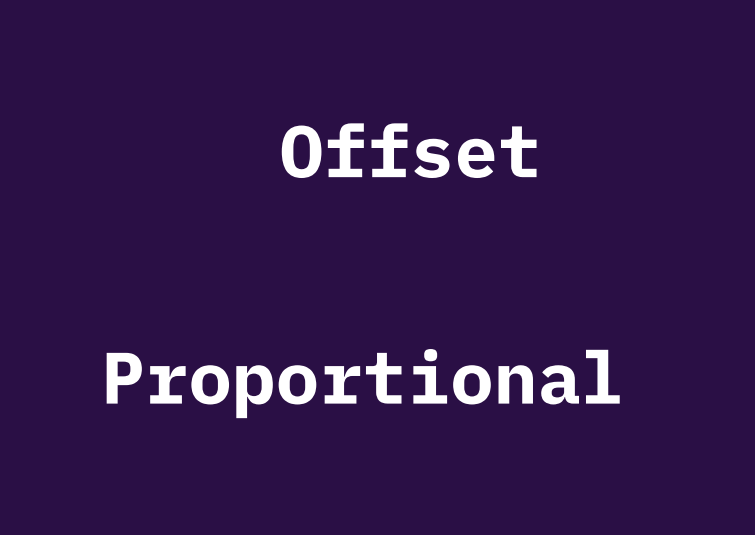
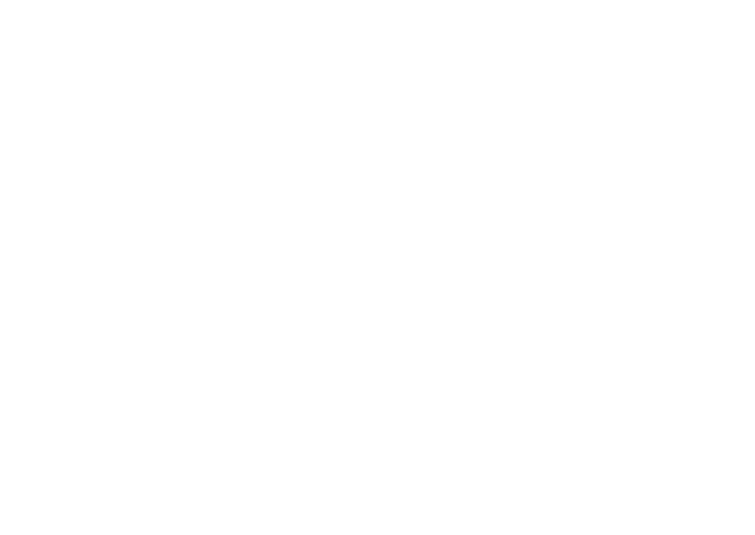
text: Offset (409, 150) -> none
text: Proportional (363, 383) -> none

